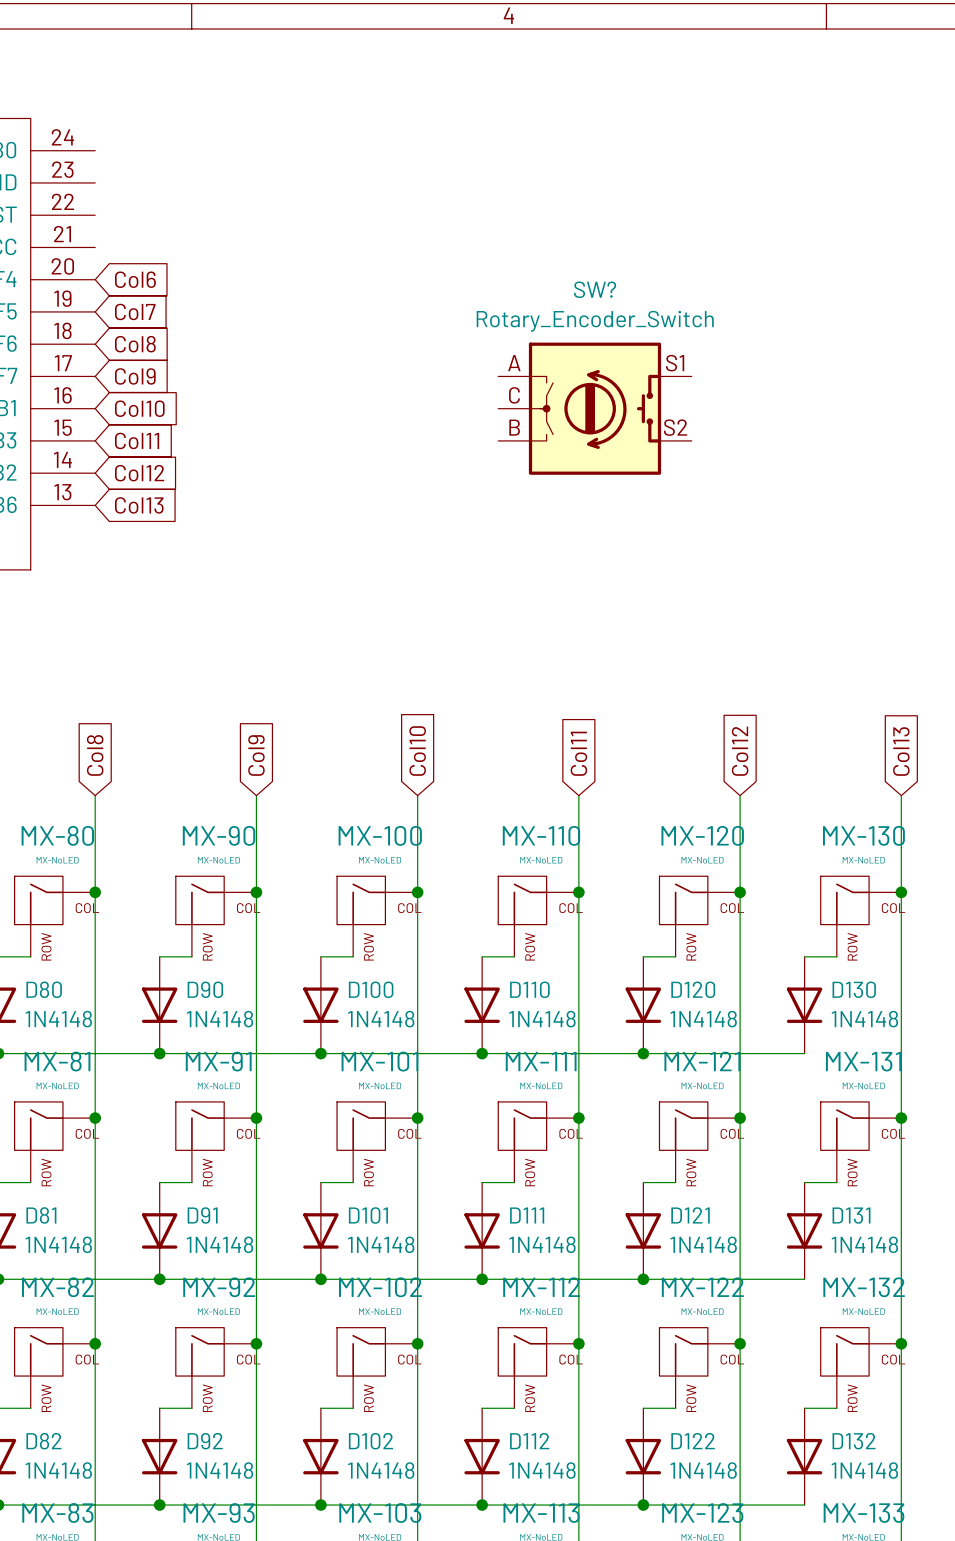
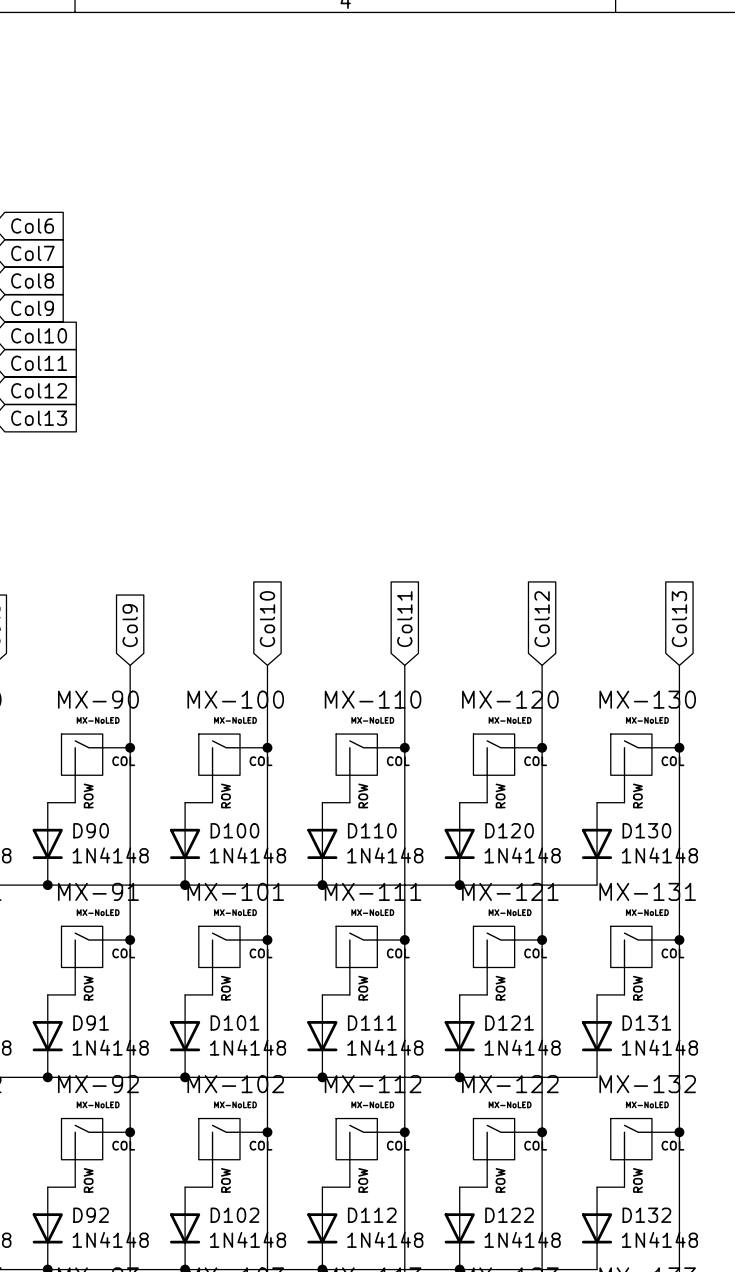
SW?: Rotary_Encoder_Switch (594, 408) -> none

